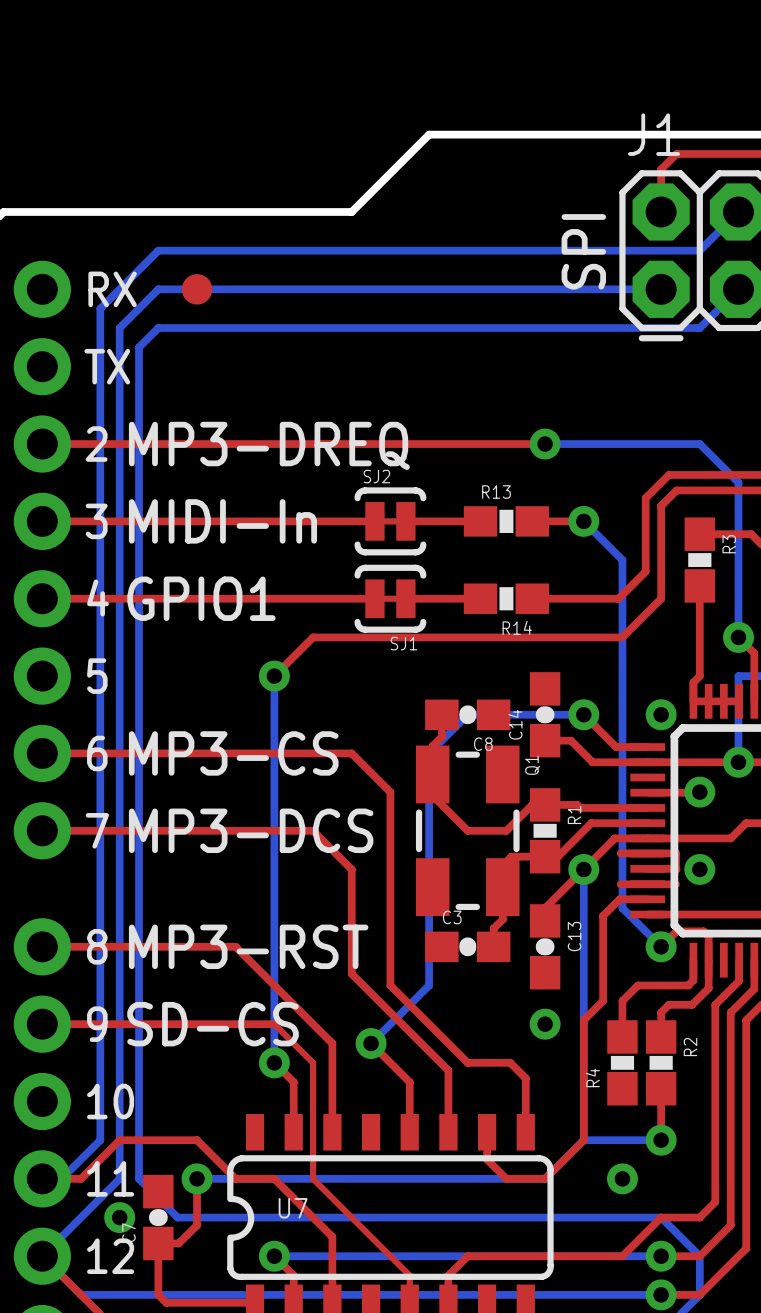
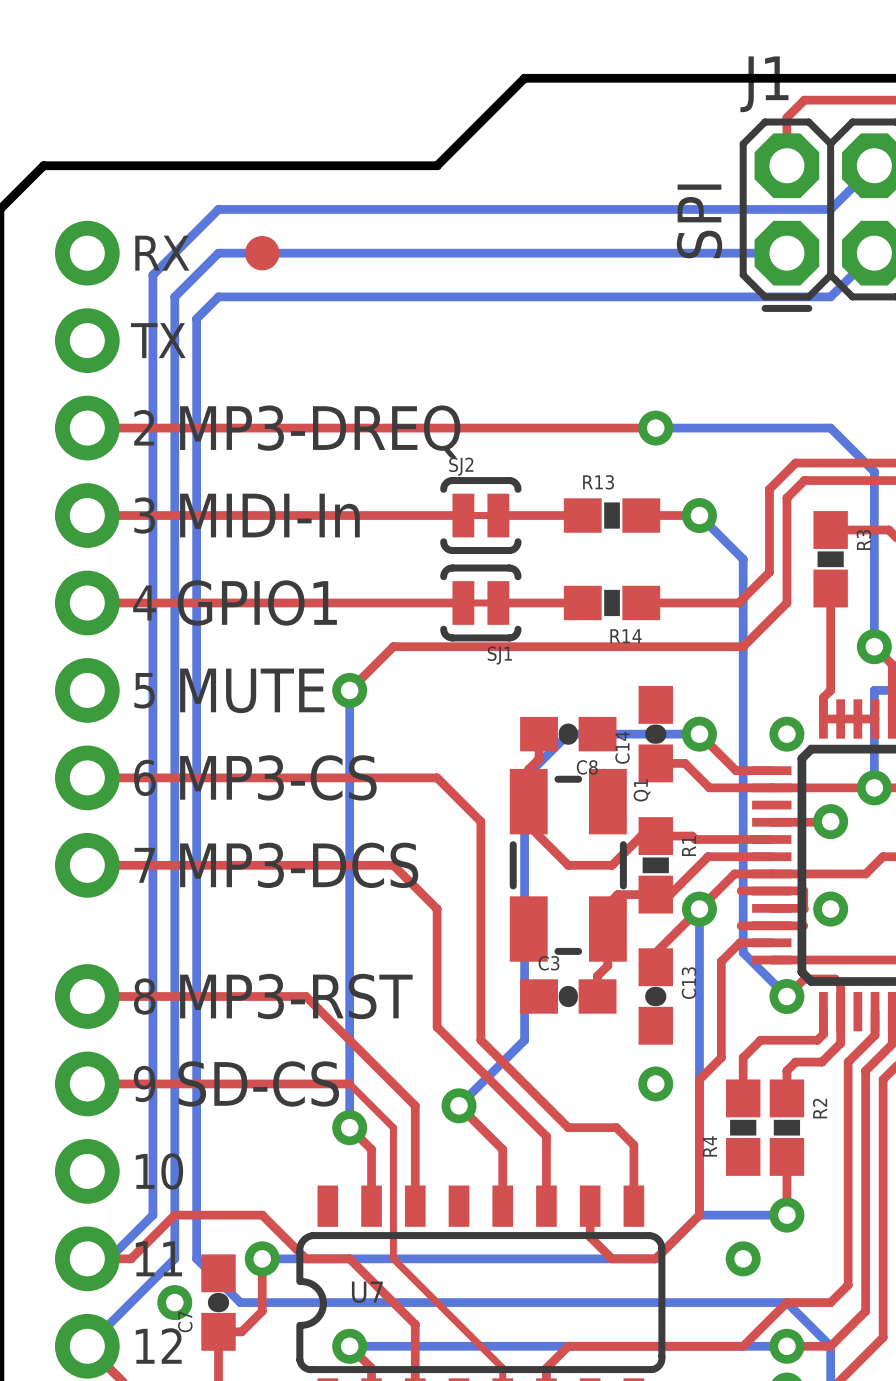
text: none -> MUTE (252, 690)

